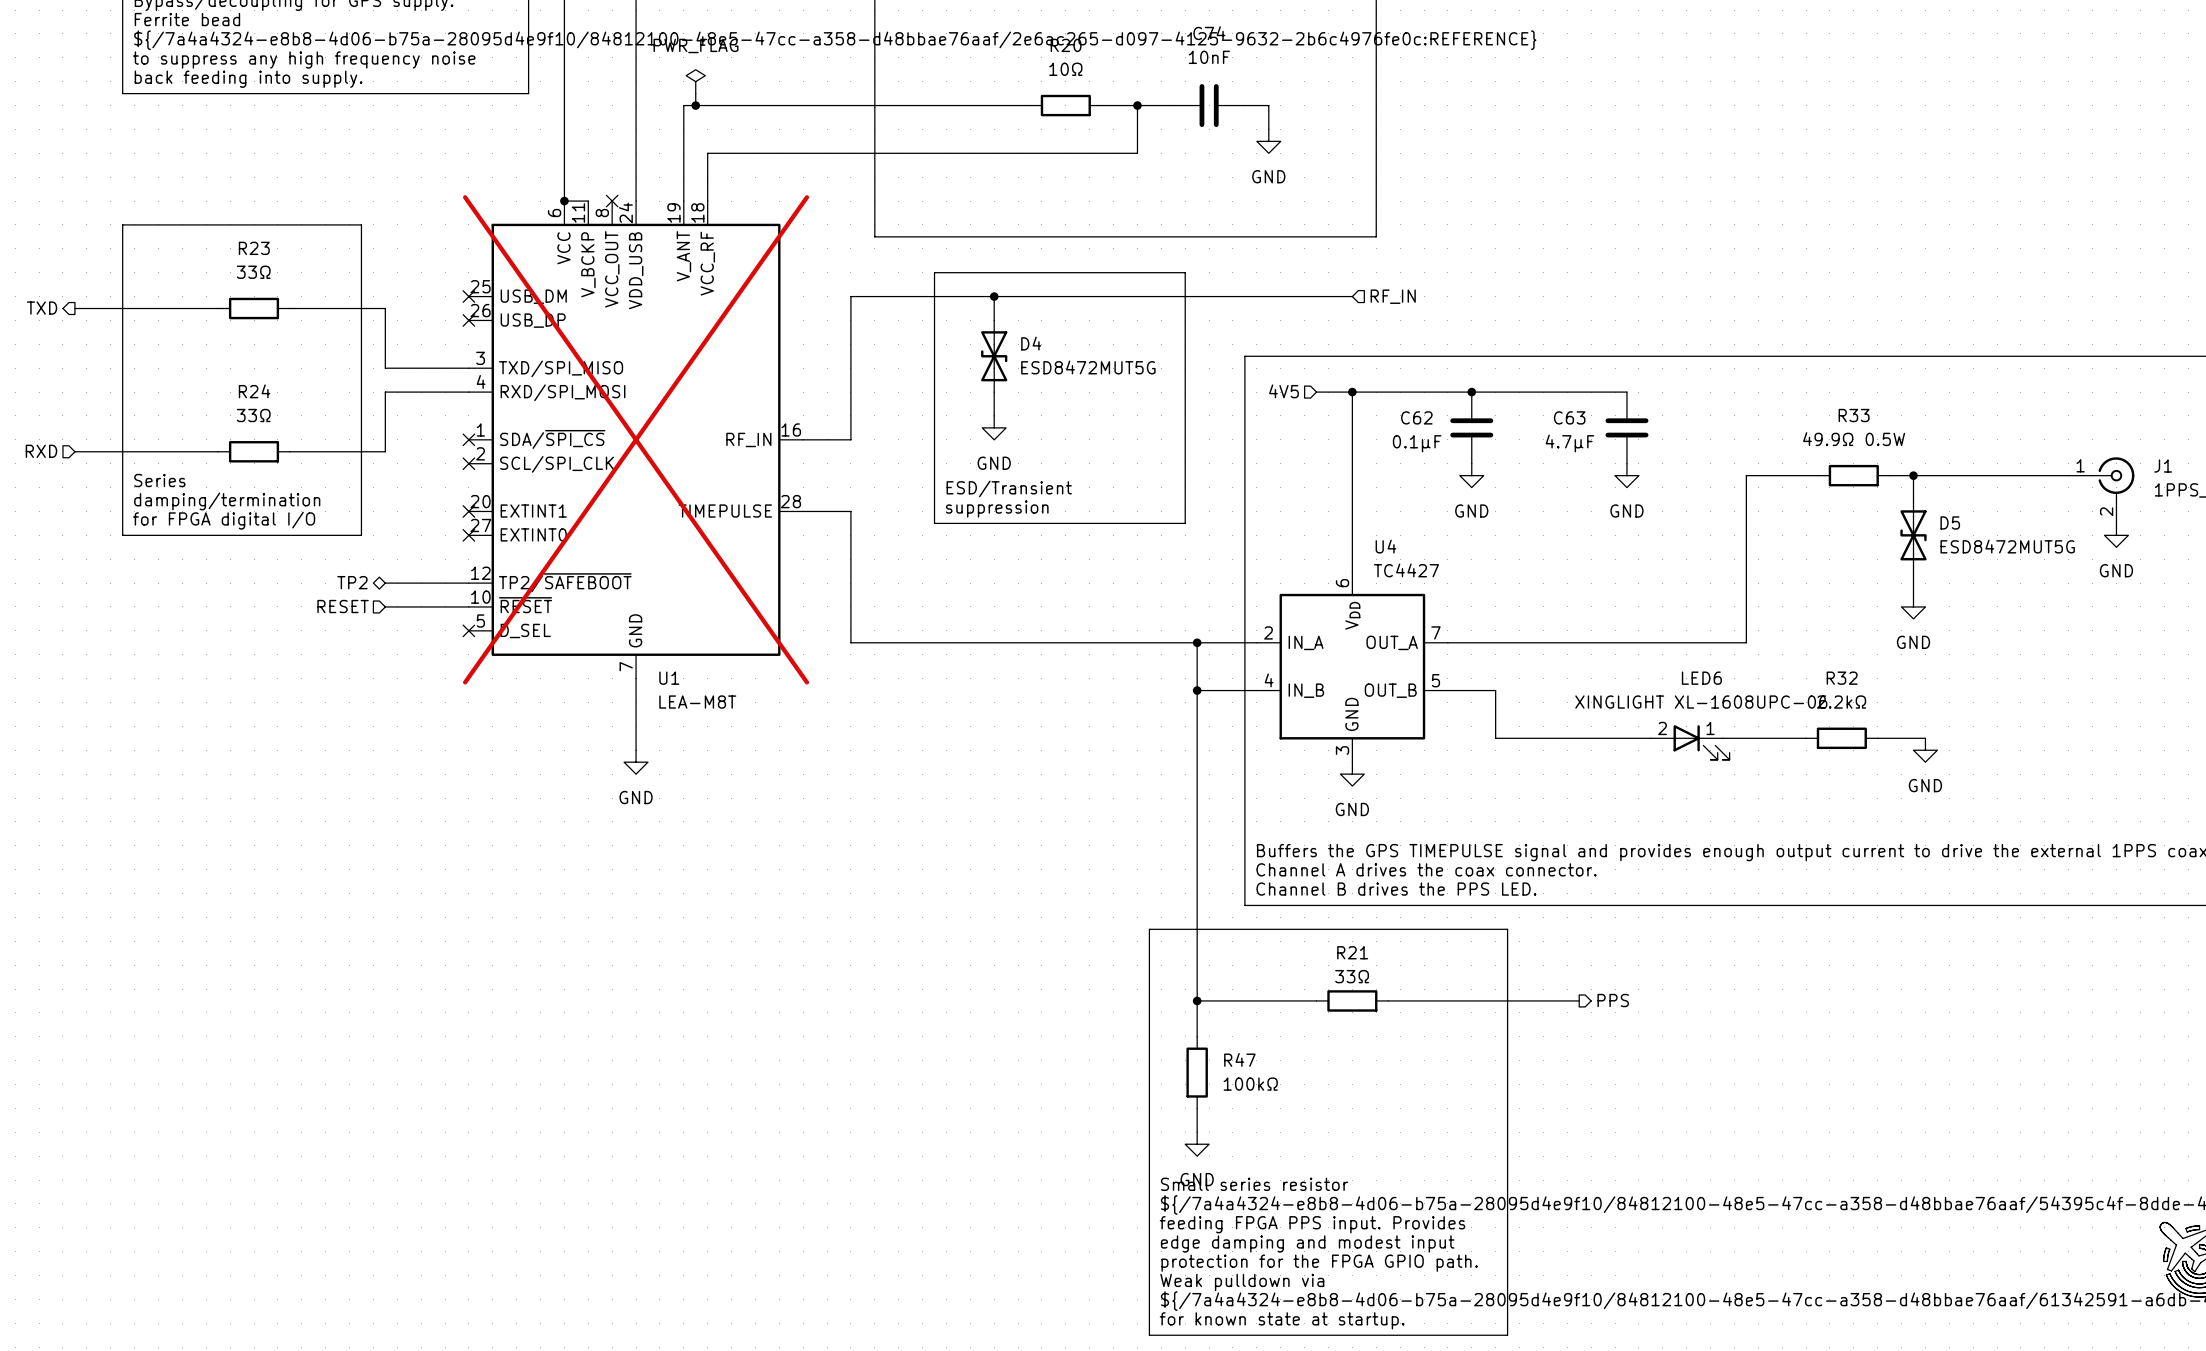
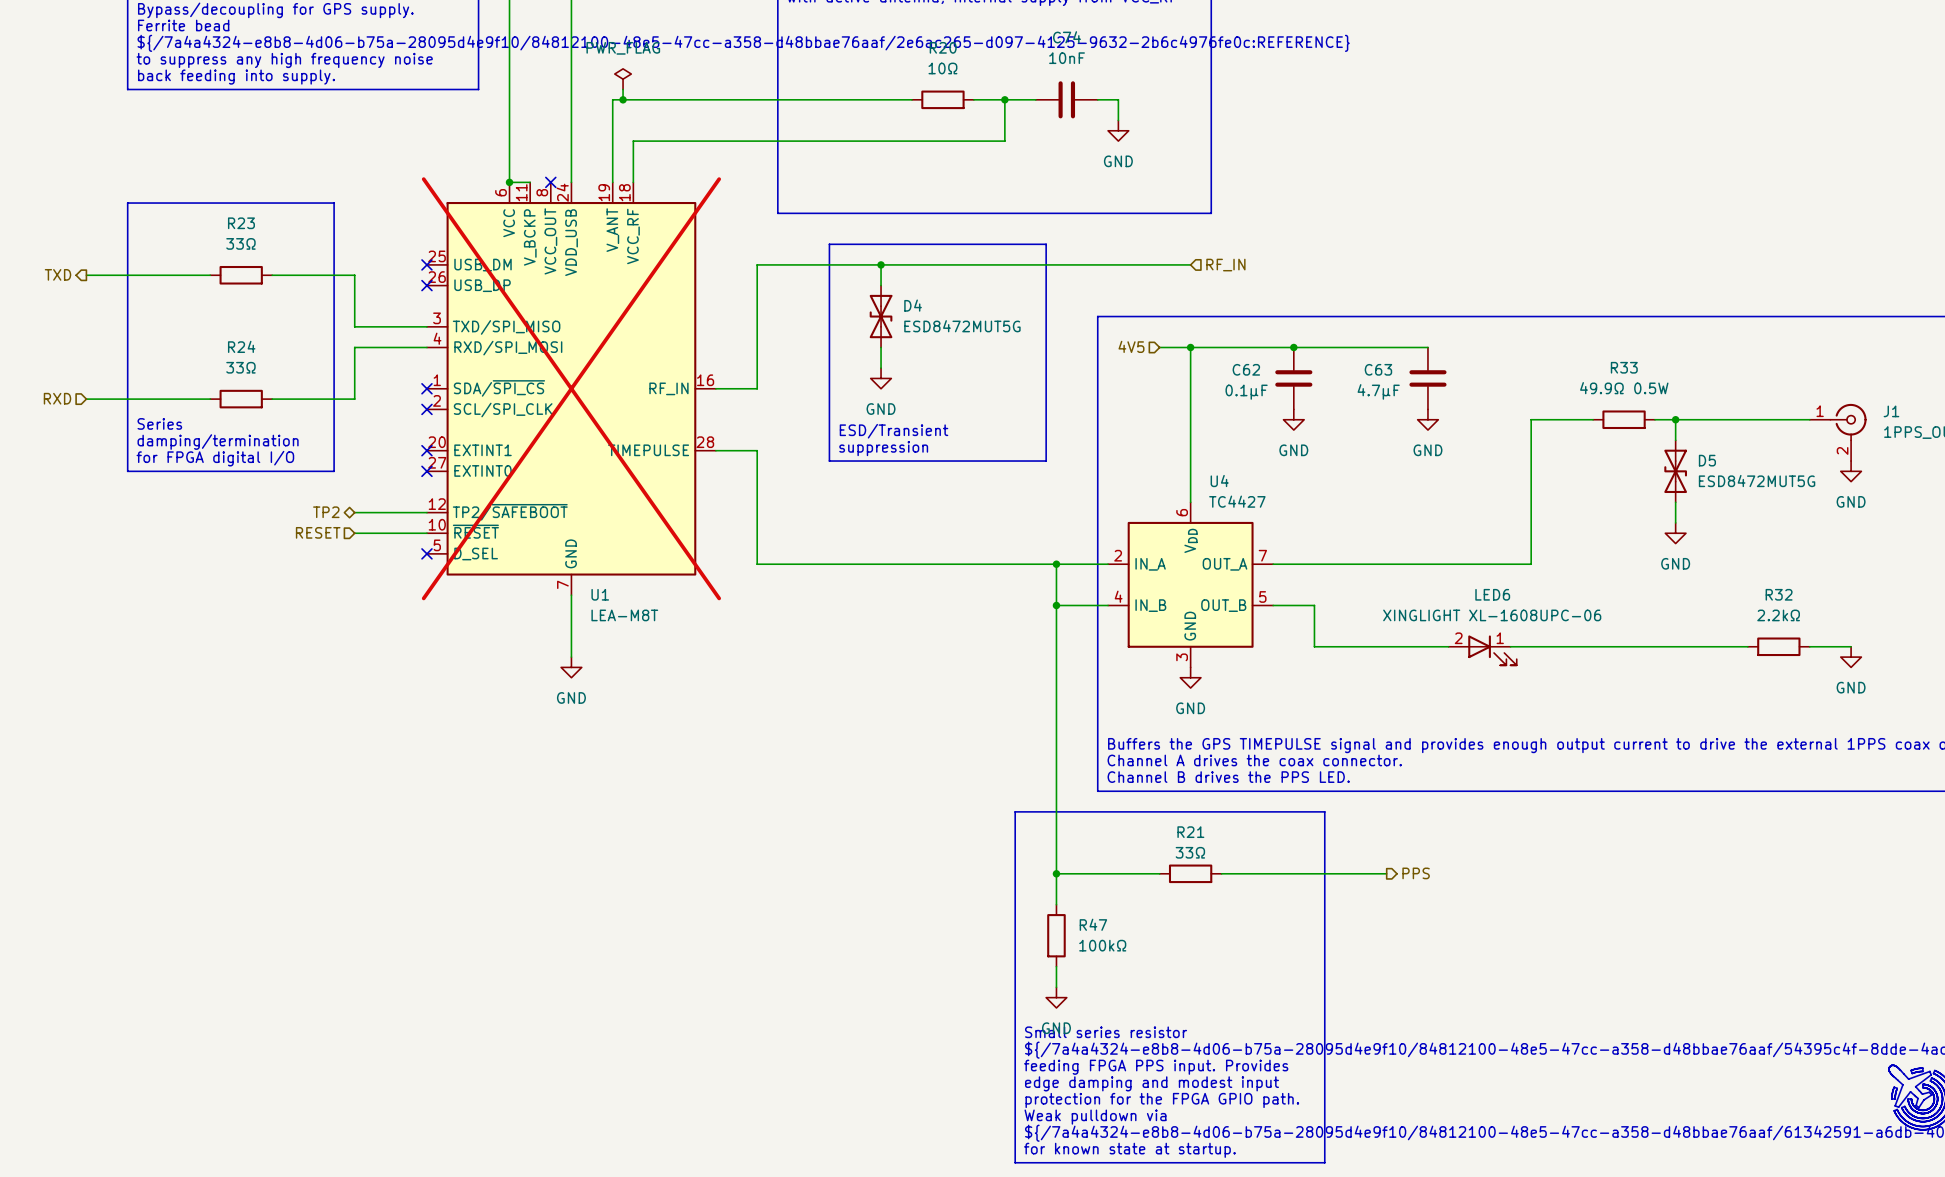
wire: none -> (1582, 646) (1644, 646)
R32 position: (1841, 738) -> (1778, 646)
wire: none -> (1685, 646) (1747, 646)
wire: none -> (1809, 646) (1851, 646)
power symbol position: GND (1925, 750) -> GND (1851, 657)

